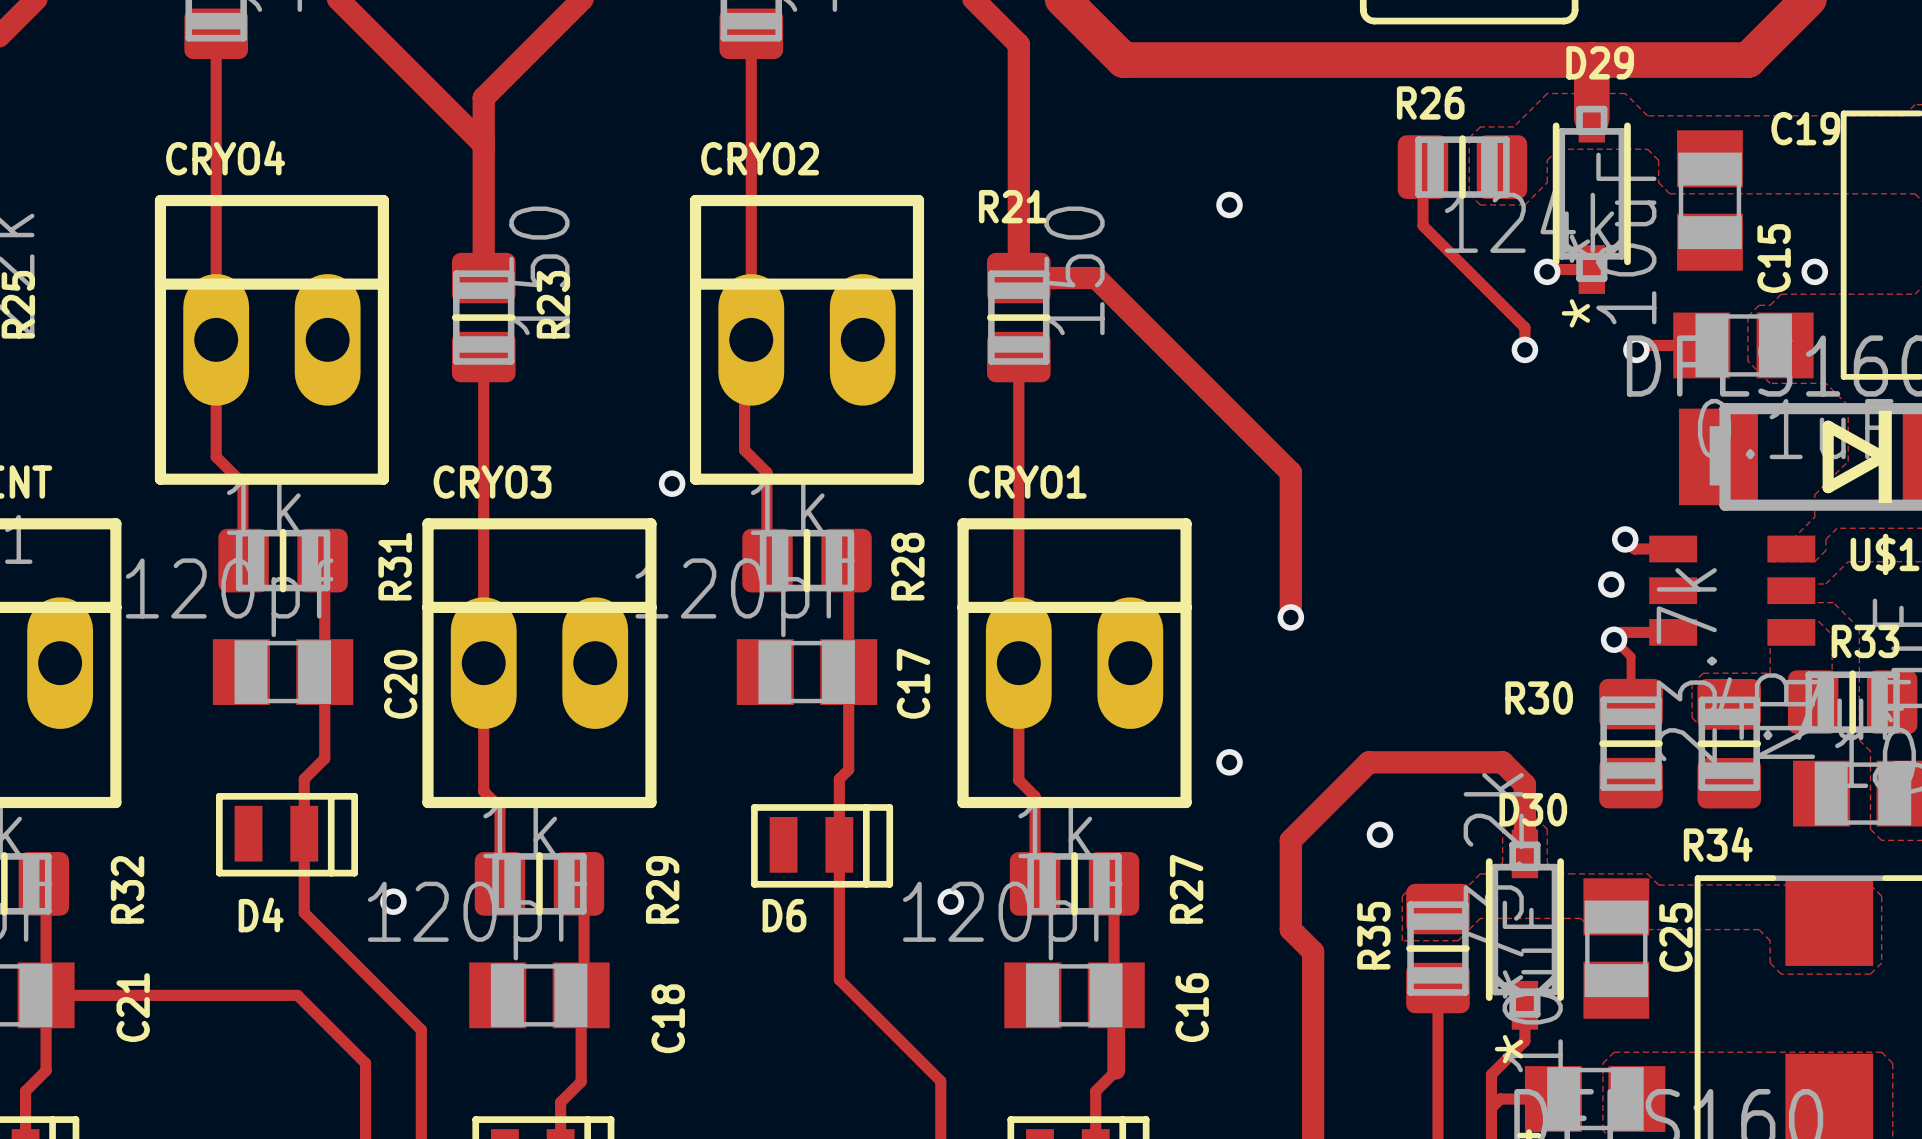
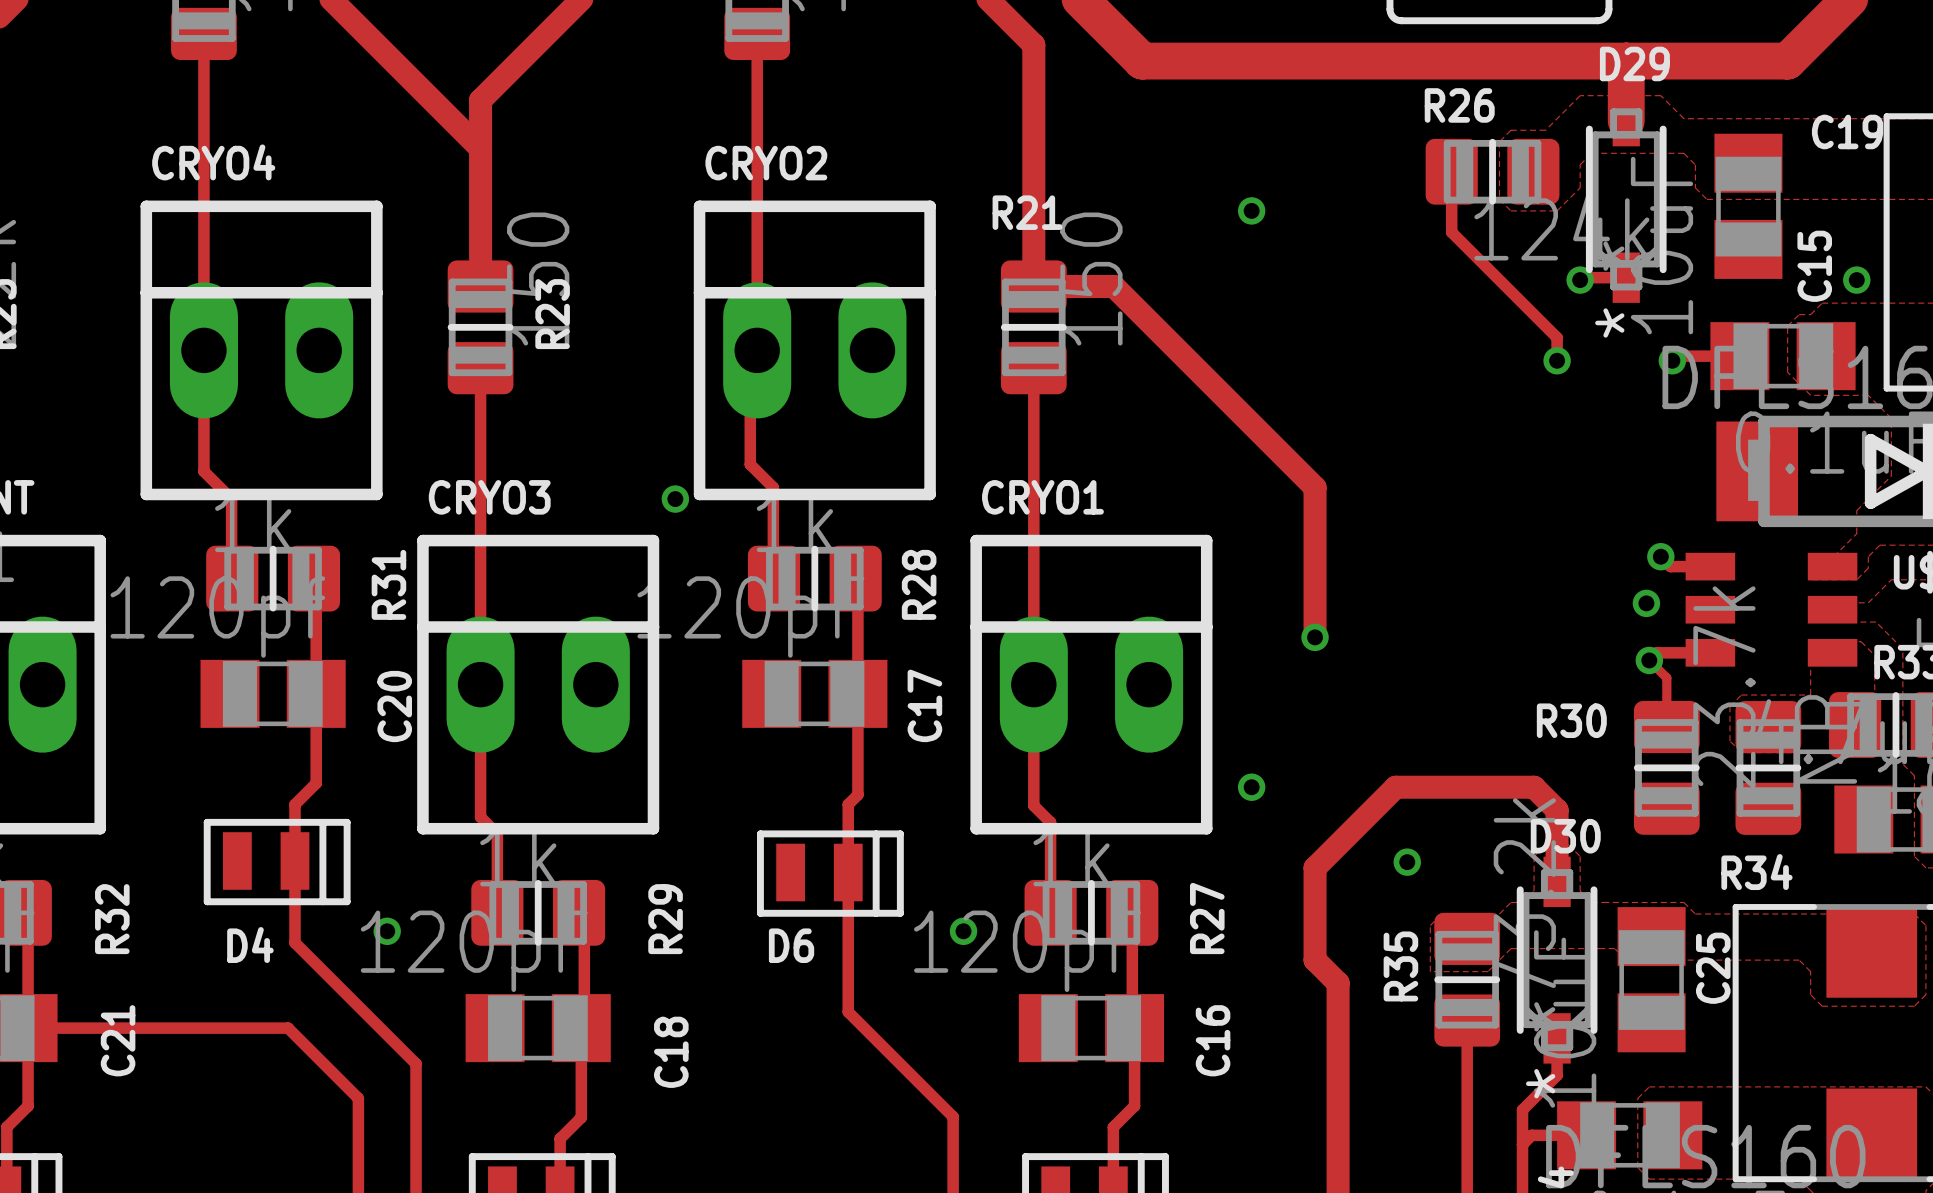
track width: thick (1116, 995) (1116, 1070) -> thin (1134, 1028) (1134, 1106)

